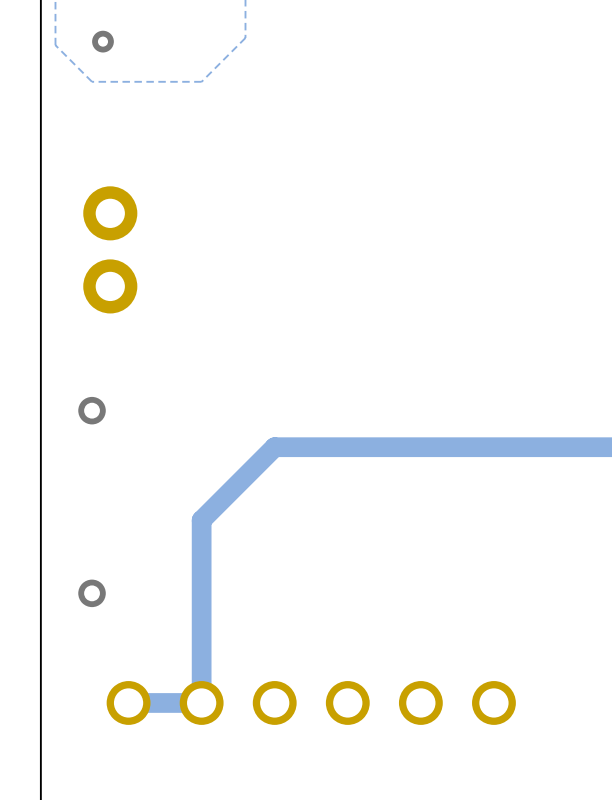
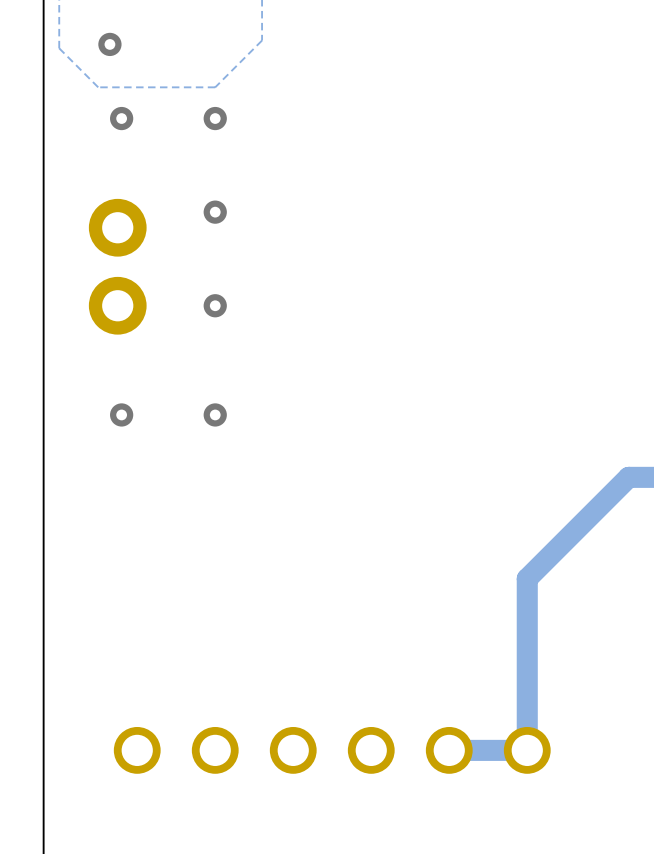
via: none -> (121, 118)
via: none -> (215, 118)
via: none -> (215, 212)
via: none -> (215, 305)
via: none -> (121, 414)
via: none -> (215, 414)
via: (92, 410) -> none
track: (588, 447) (274, 447) (201, 520) (201, 702) (128, 702) -> (628, 477) (527, 578) (527, 750) (449, 750)
via: (92, 593) -> none

